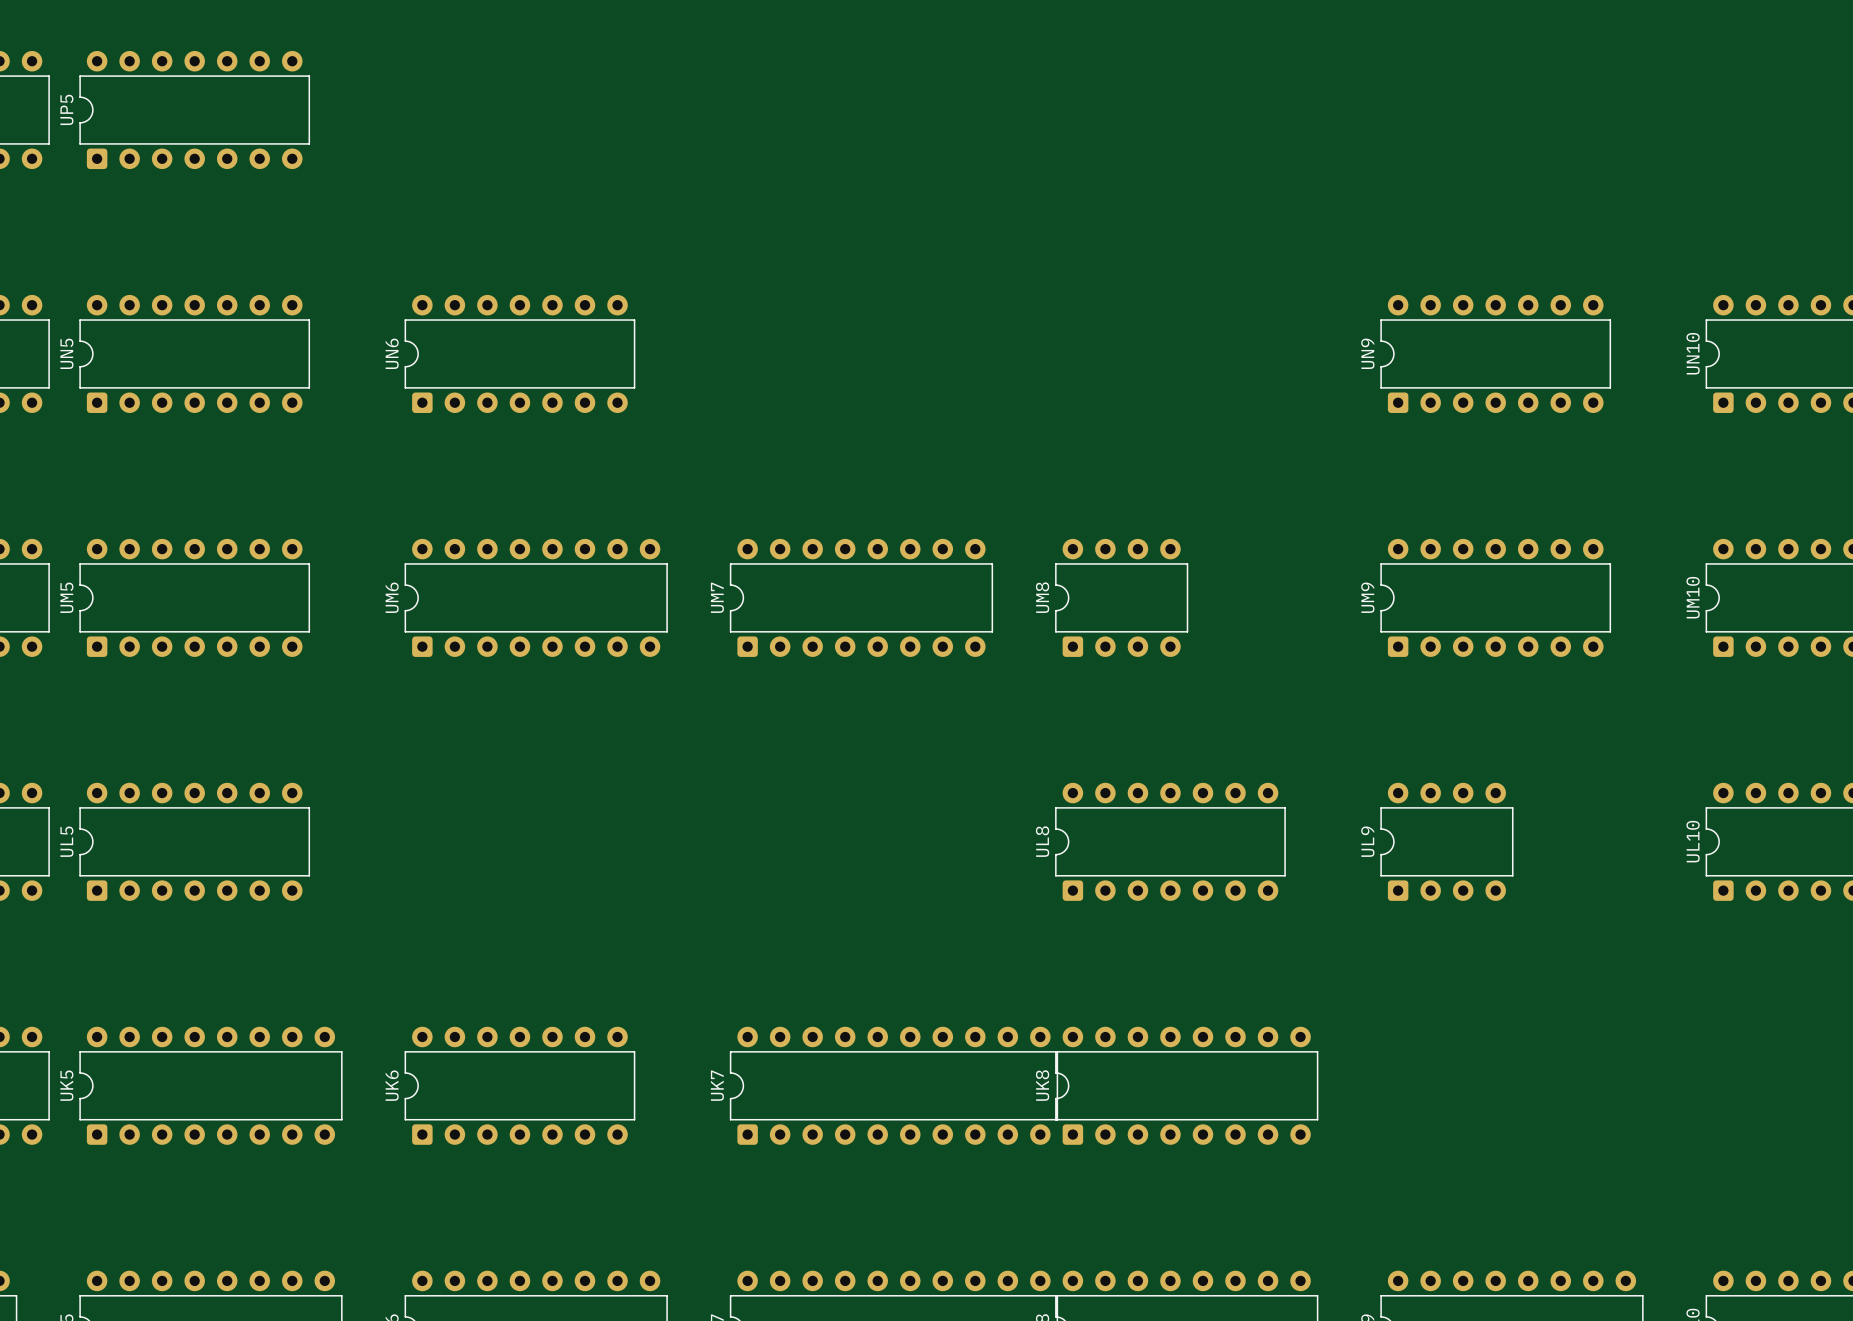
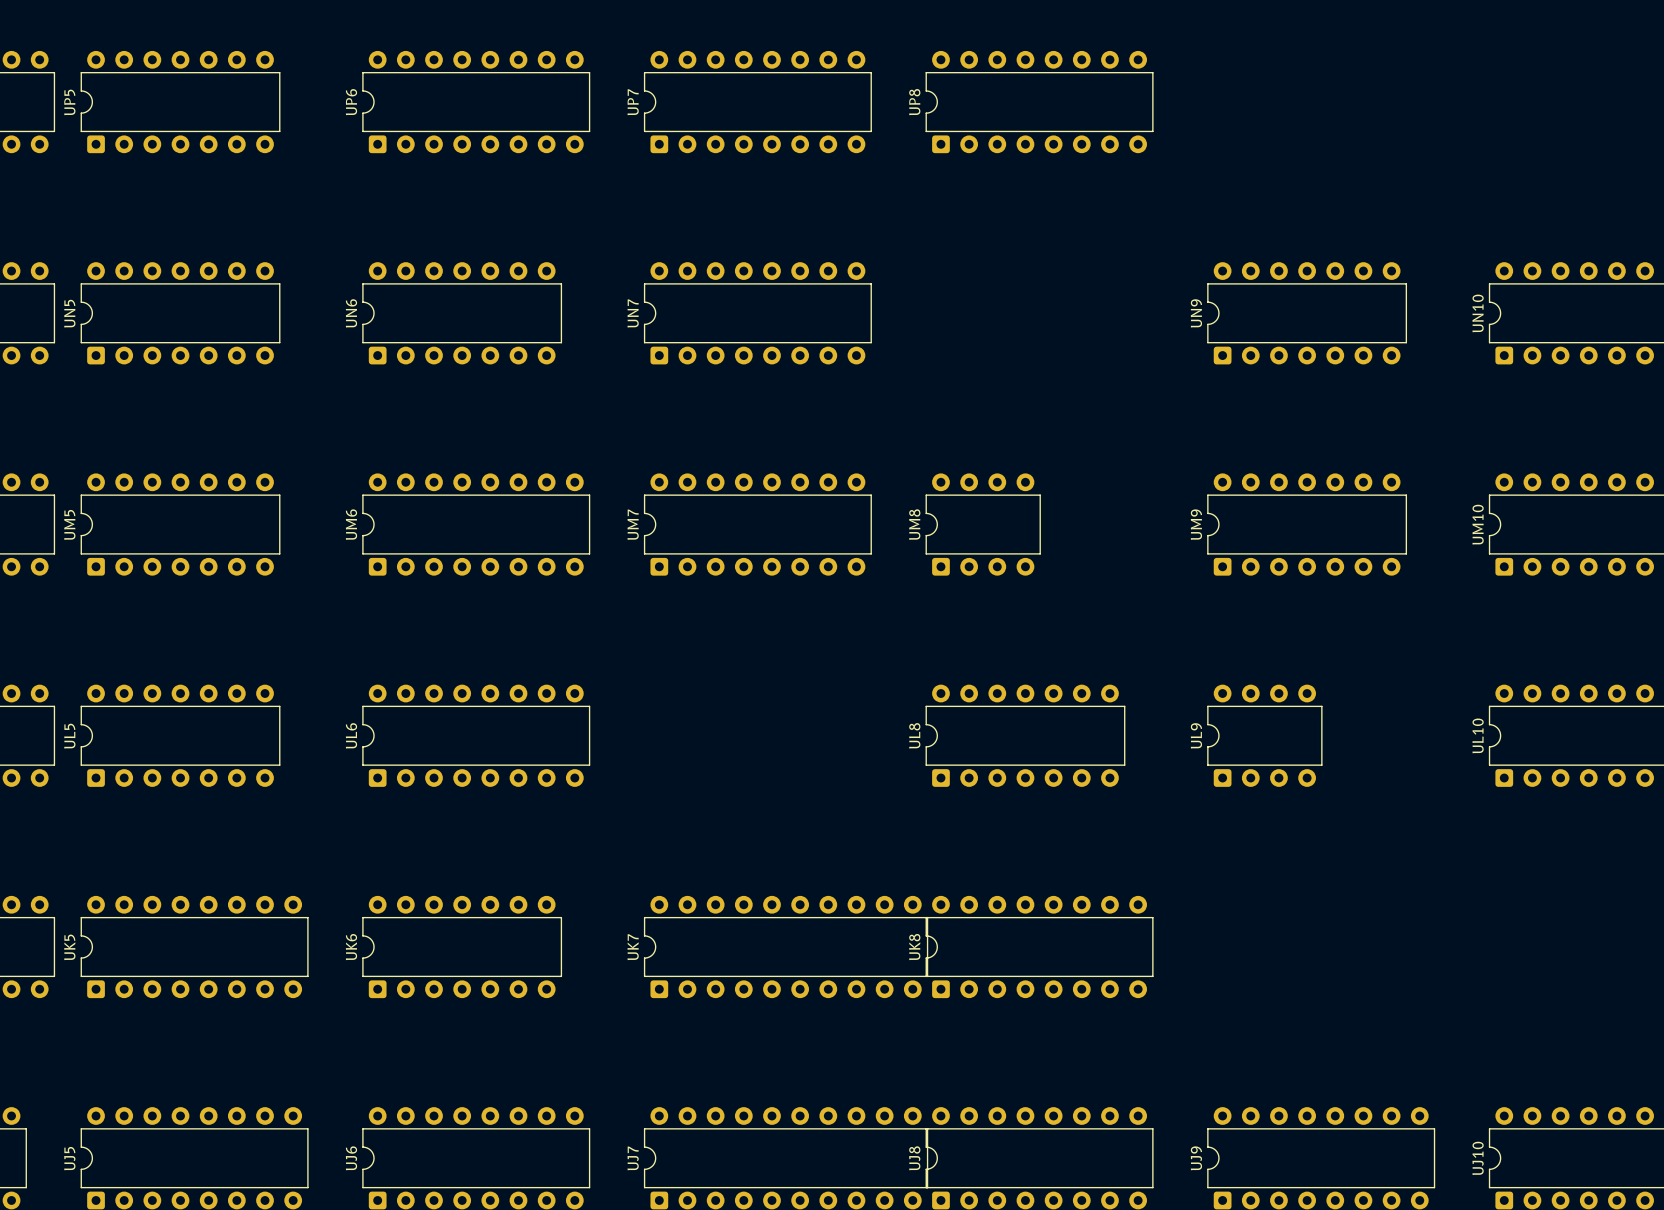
UP6: none -> (476, 102)
UP7: none -> (757, 102)
UP8: none -> (1039, 102)
UN7: none -> (757, 313)
UL6: none -> (476, 735)

